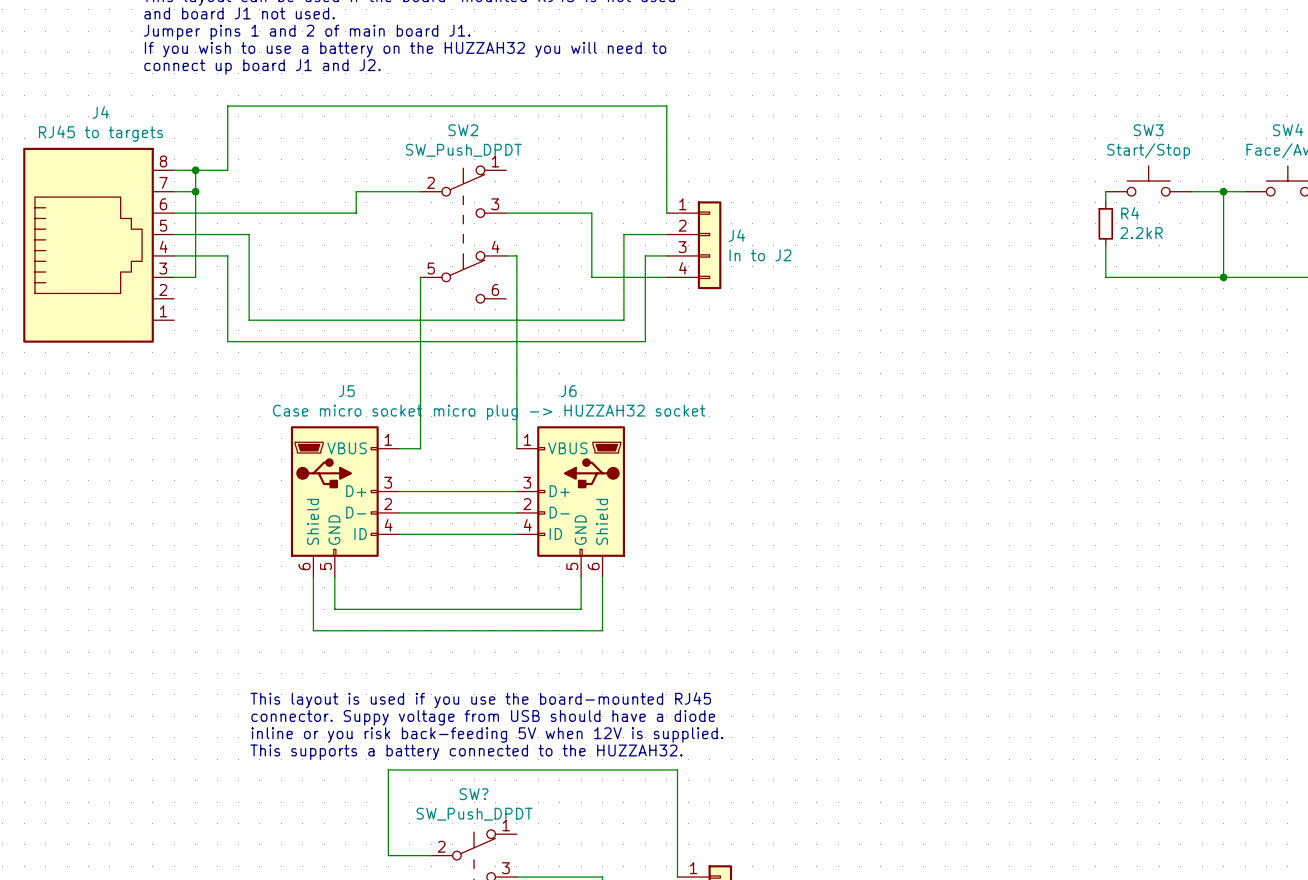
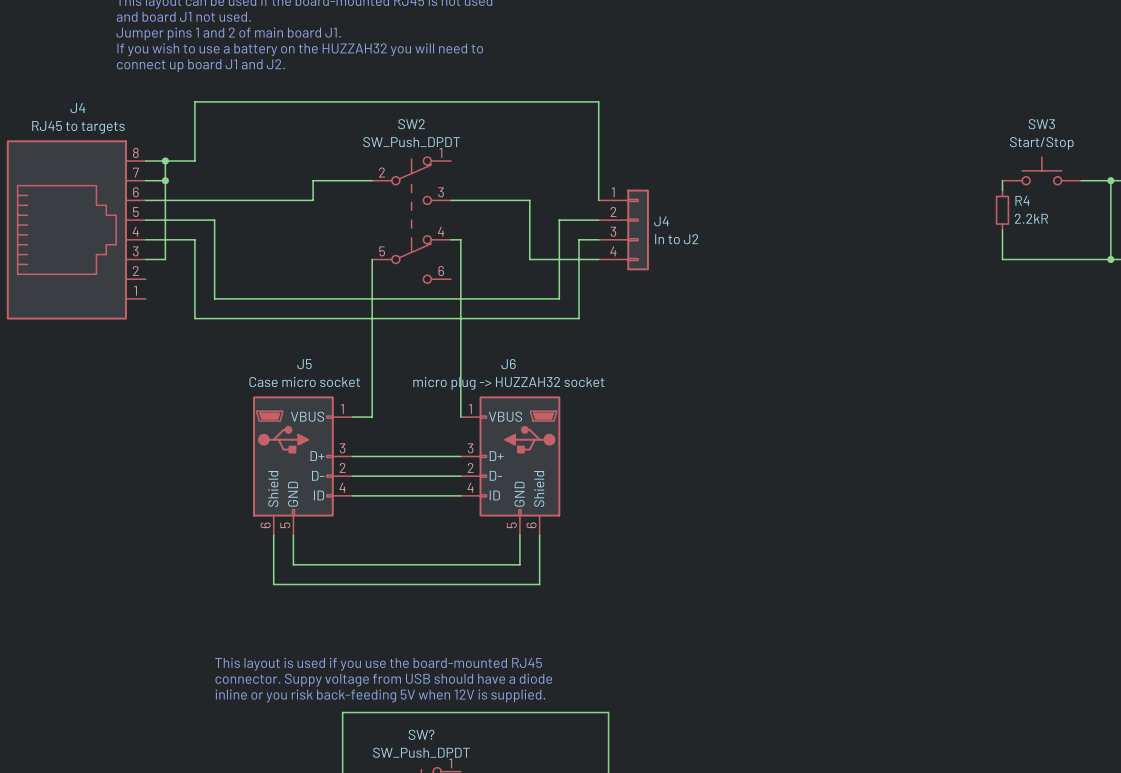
text: This layout is used if you use the board-mounted RJ45 (480, 700) -> none
text: connector. Suppy voltage from USB should have a diode (483, 717) -> This layout is used if you use the board-mounted RJ45 (378, 664)
text: inline or you risk back-feeding 5V when 12V is supplied. (487, 735) -> connector. Suppy voltage from USB should have a diode (383, 680)
text: This supports a battery connected to the HUZZAH32. (466, 752) -> inline or you risk back-feeding 5V when 12V is supplied. (380, 695)

